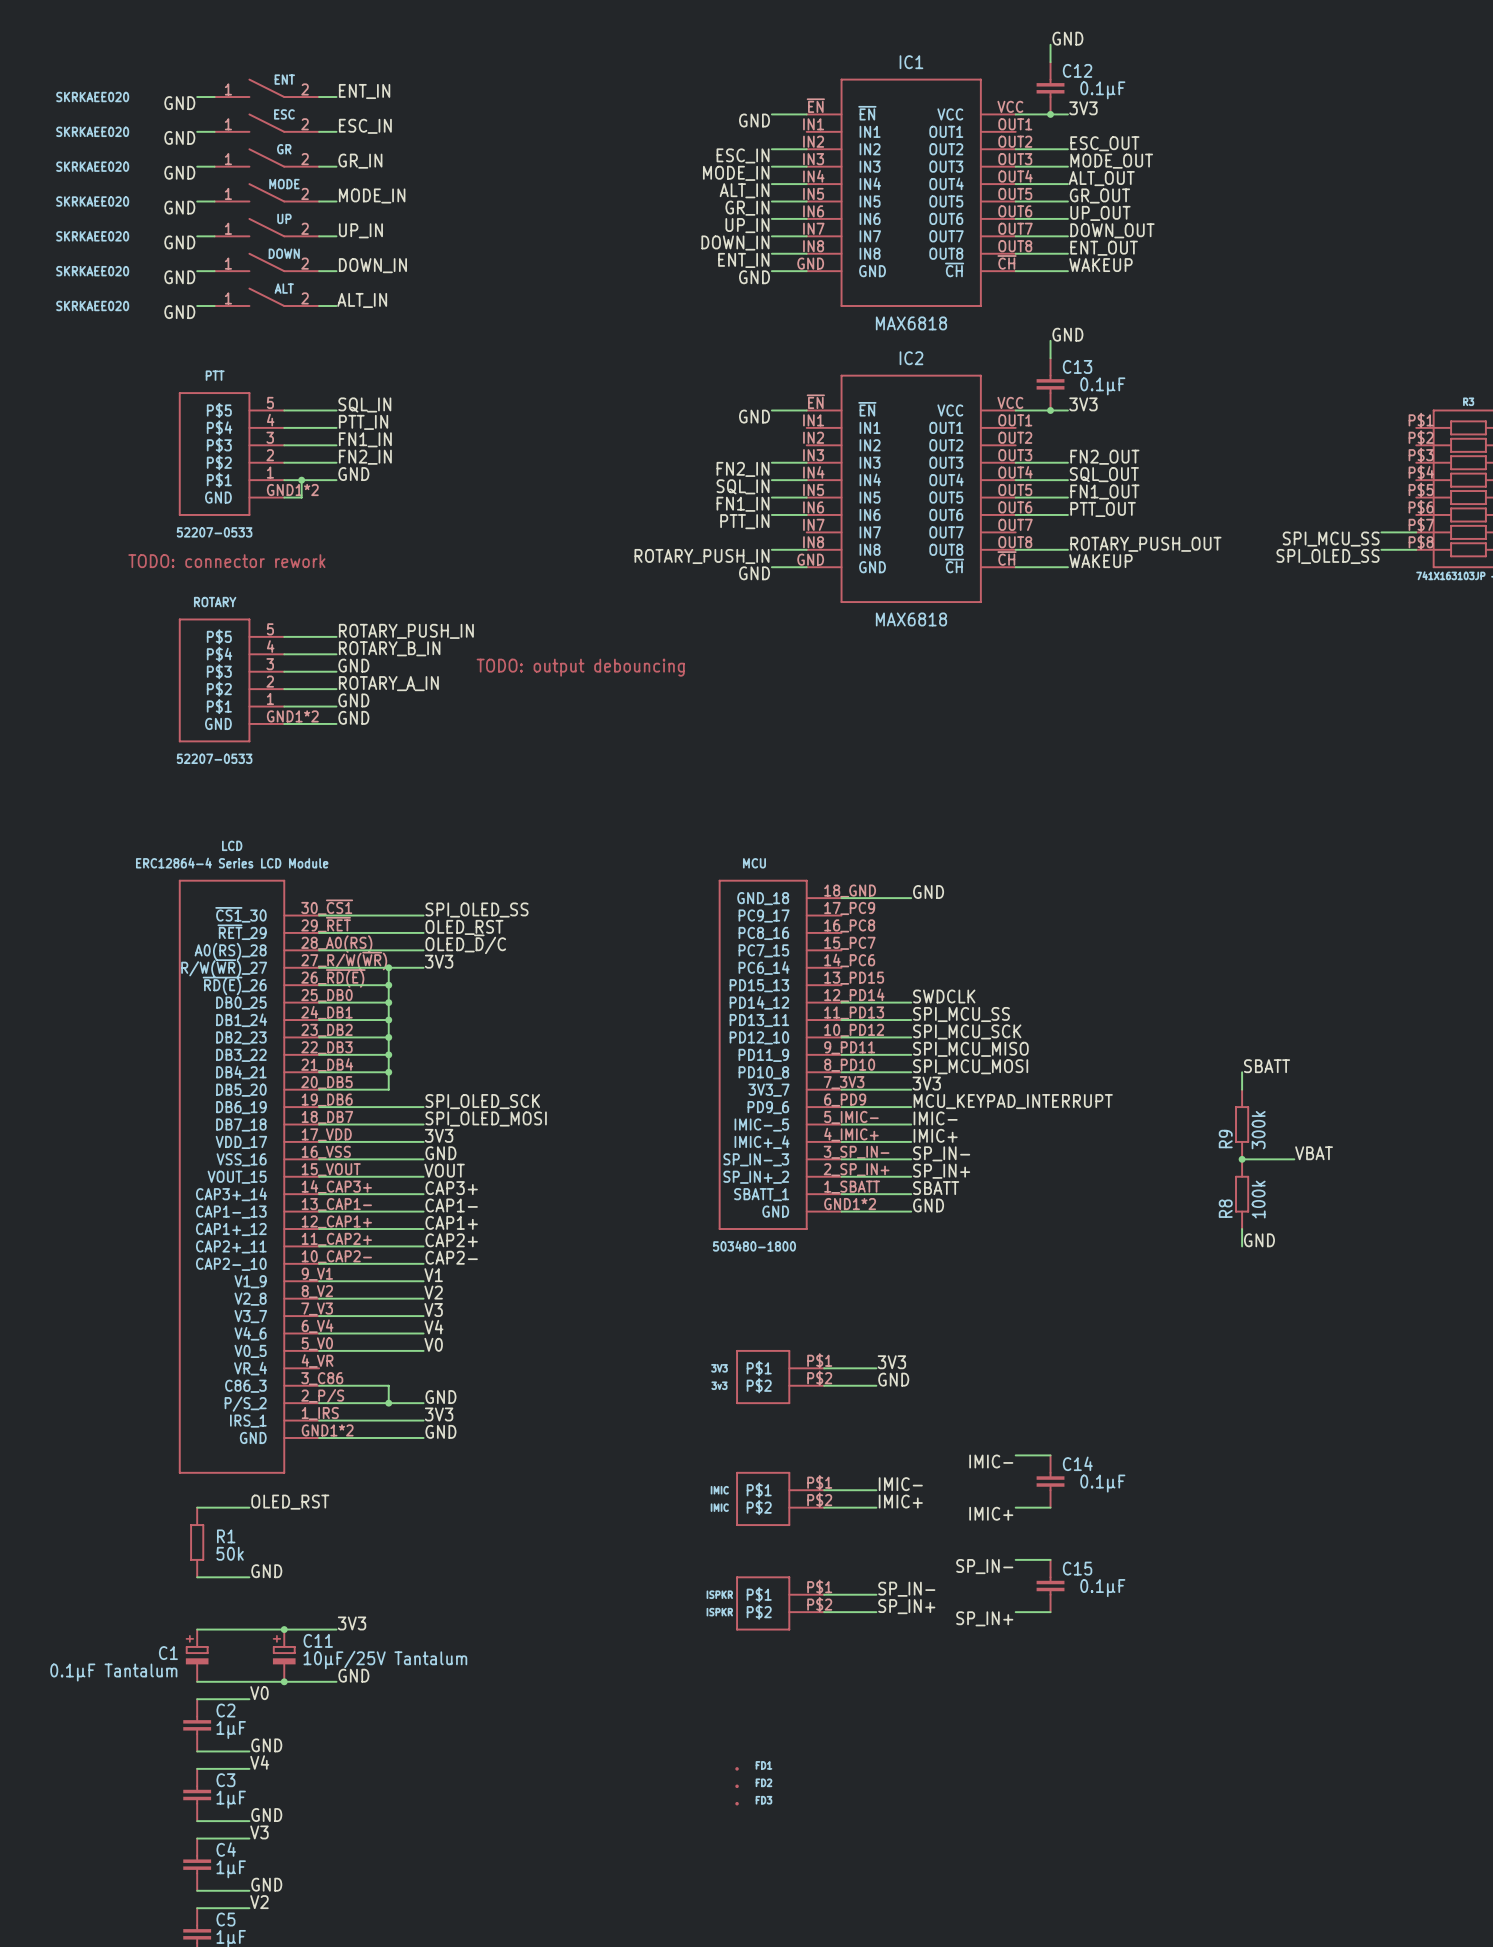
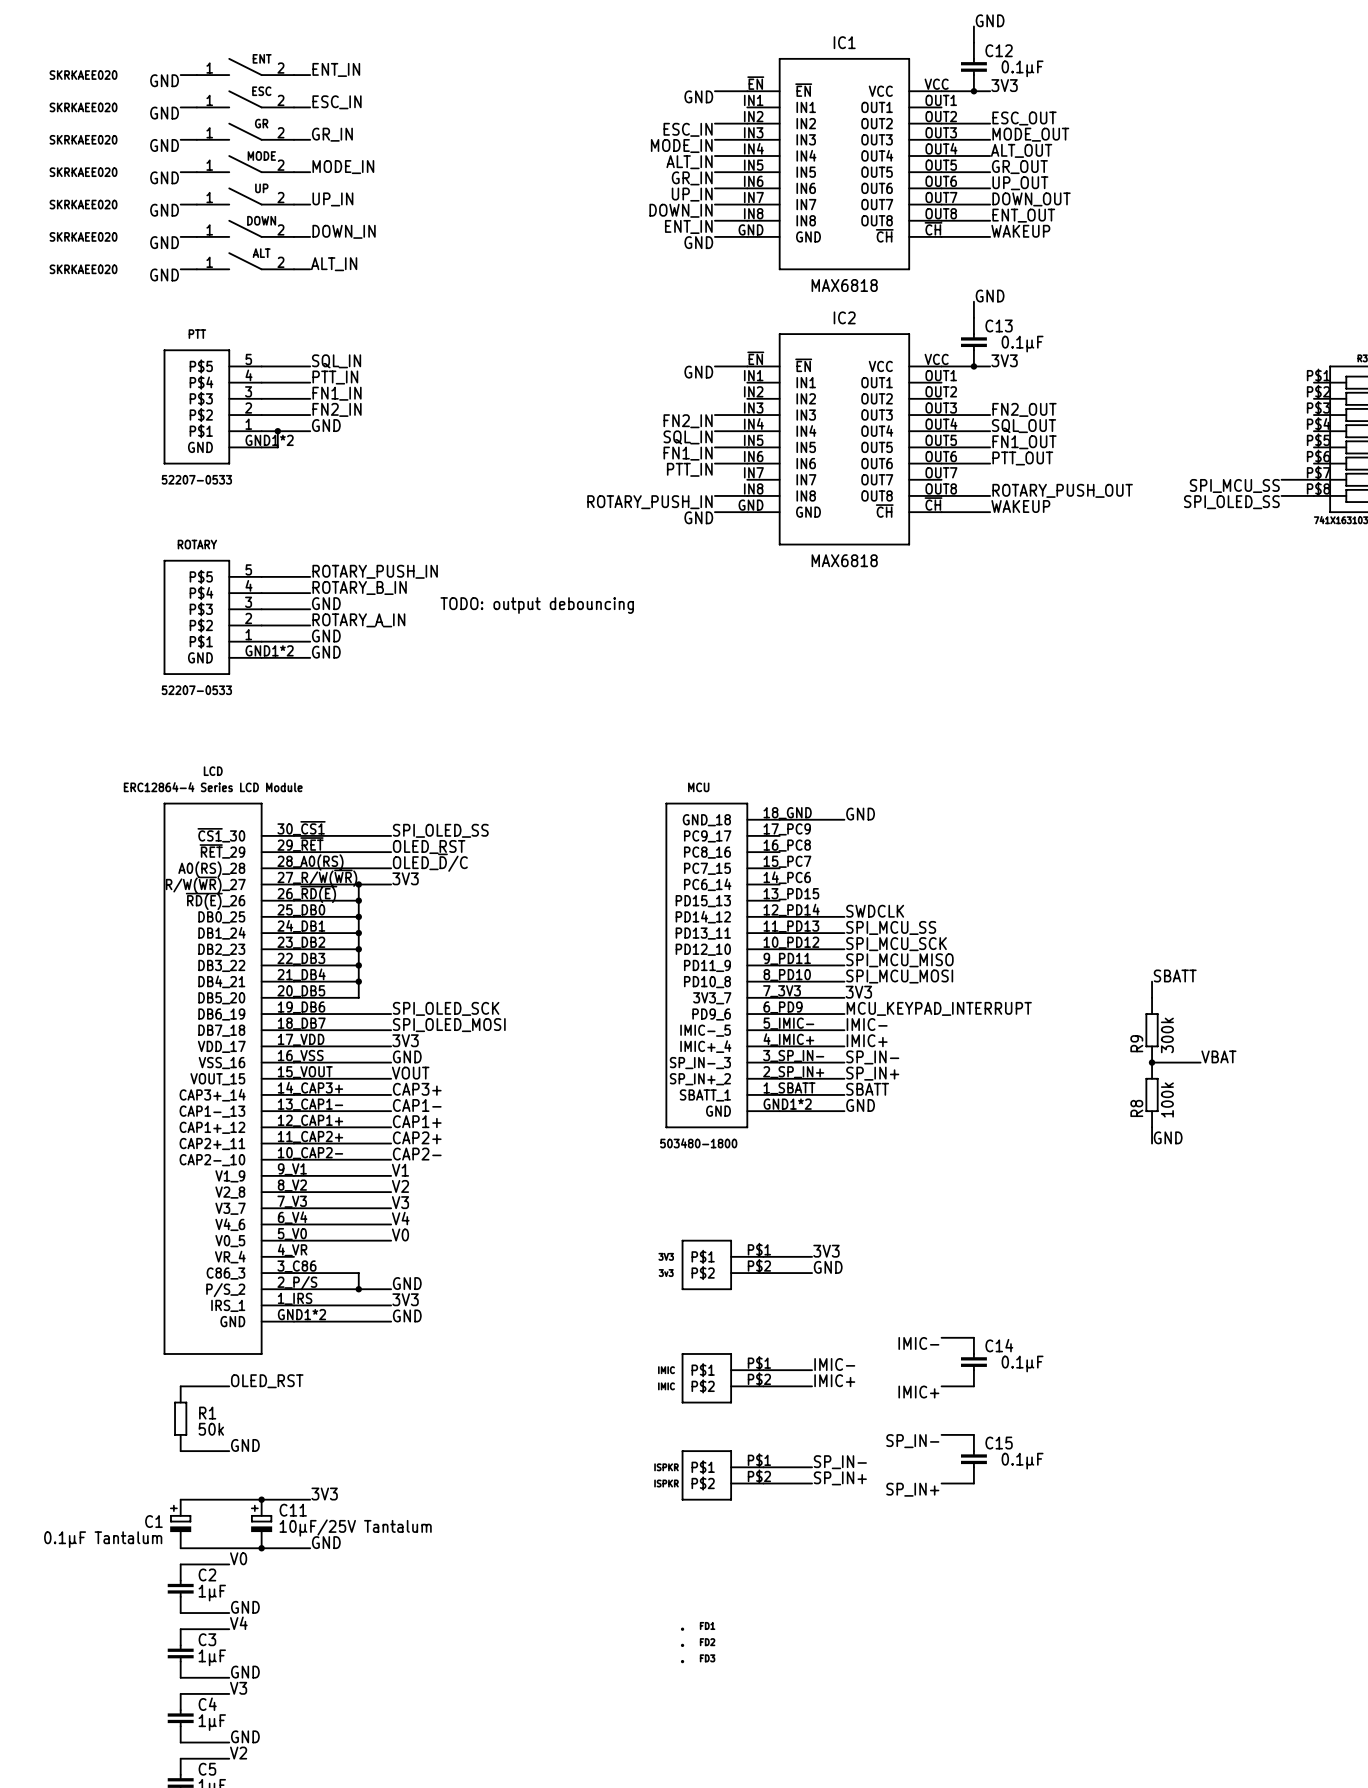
text: TODO: connector rework (226, 561) -> none

